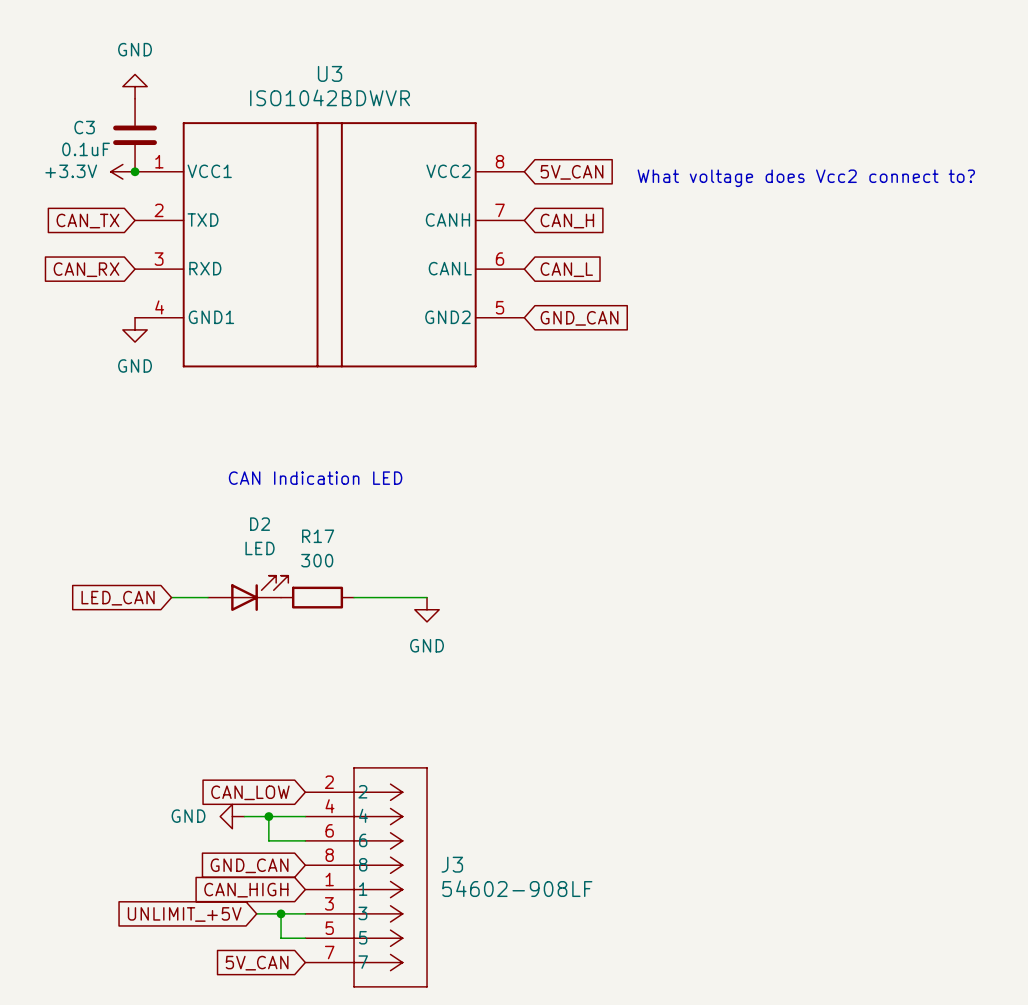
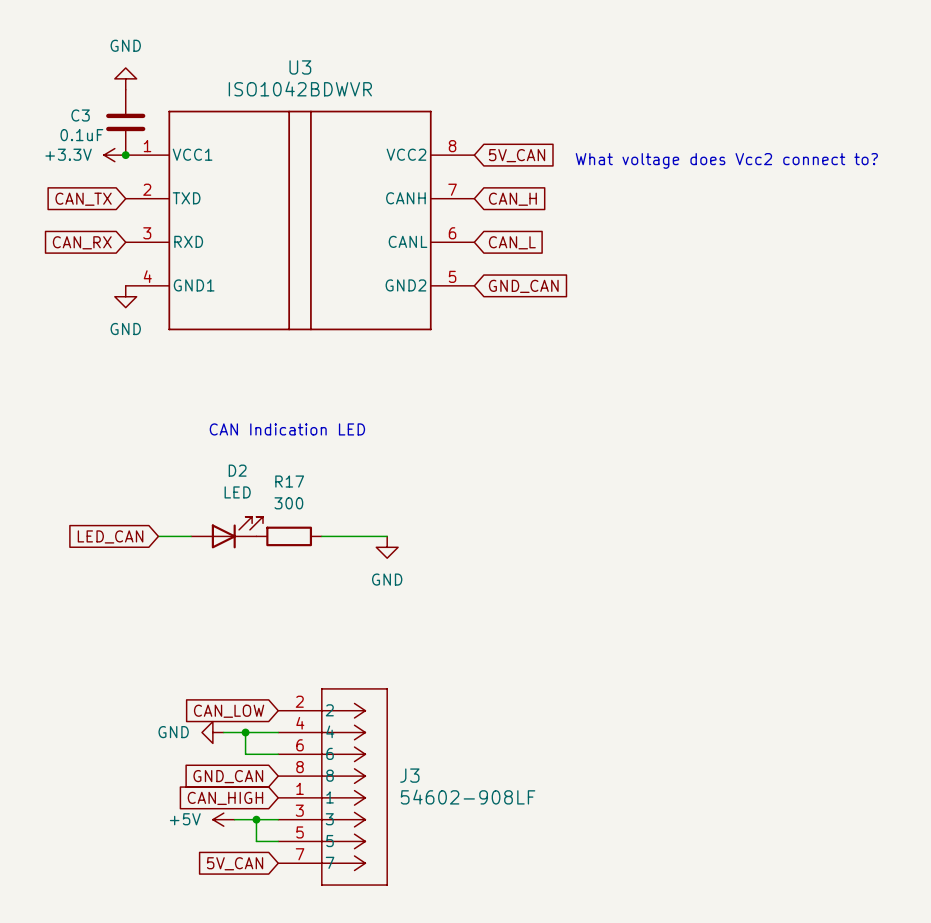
power symbol: none -> +5V (223, 819)
global label: UNLIMIT_+5V (184, 914) -> none

